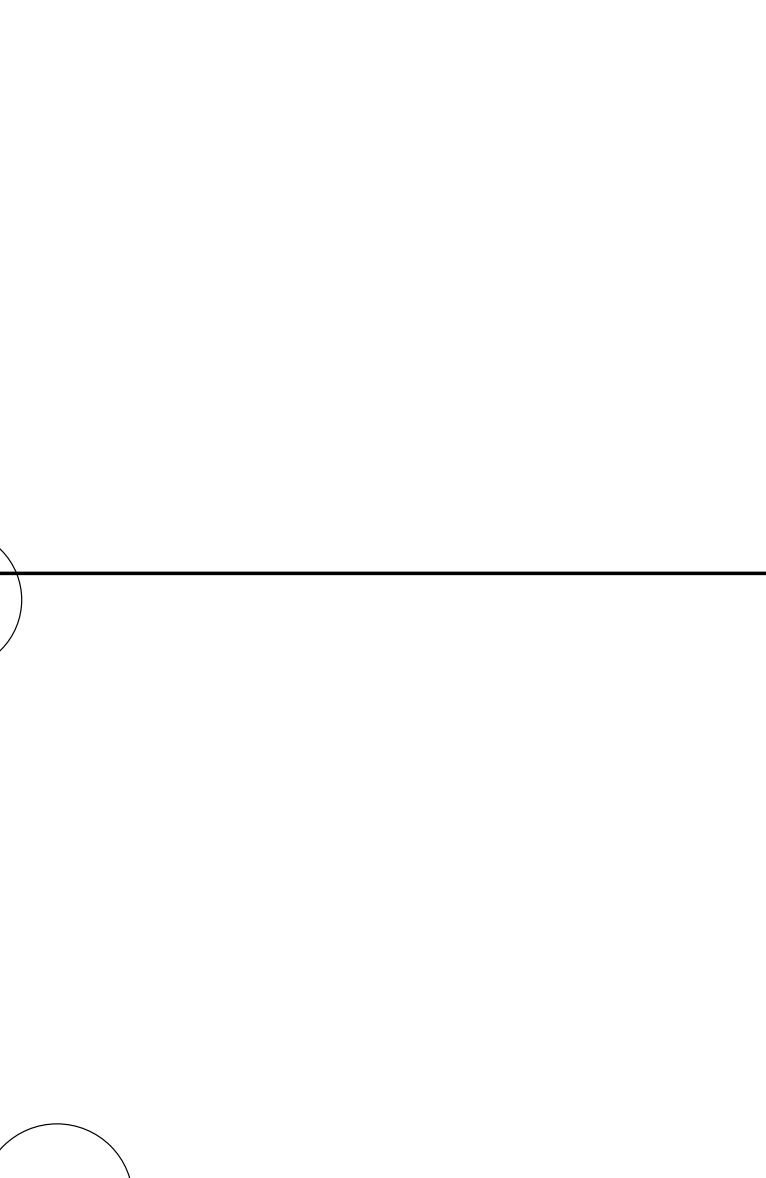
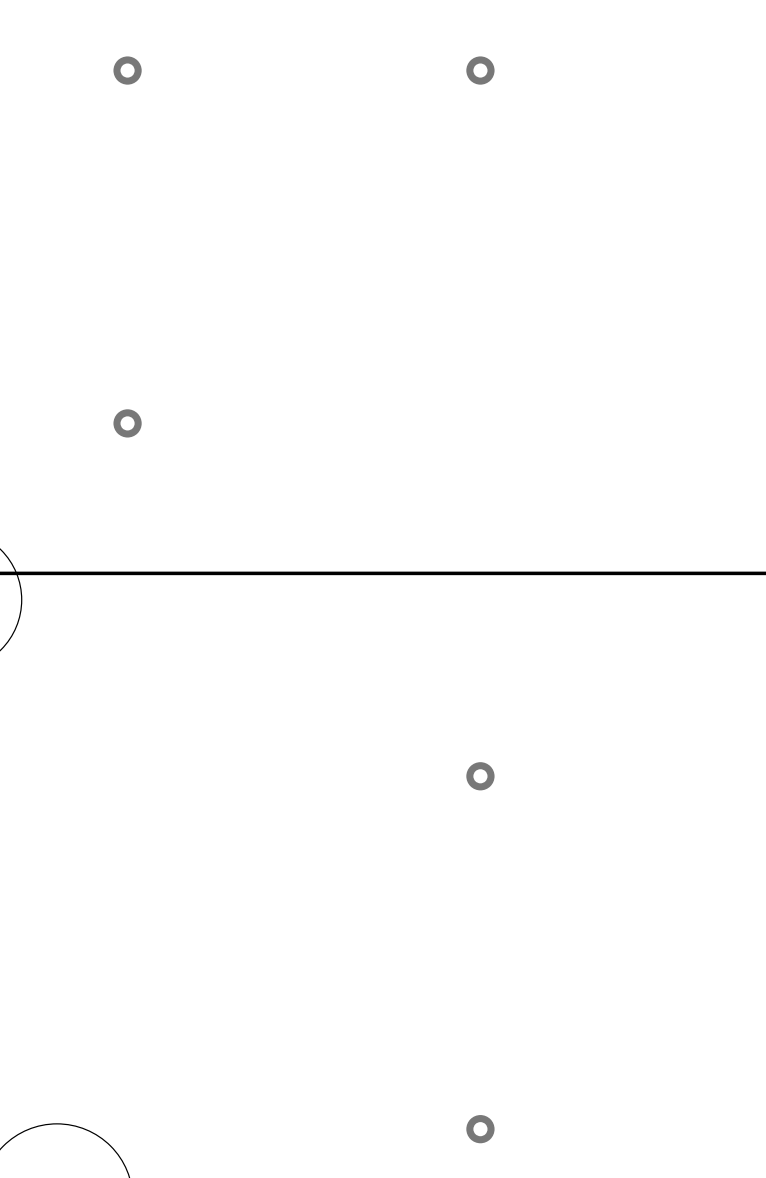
via: none -> (127, 70)
via: none -> (480, 70)
via: none -> (127, 423)
via: none -> (480, 776)
via: none -> (480, 1129)

